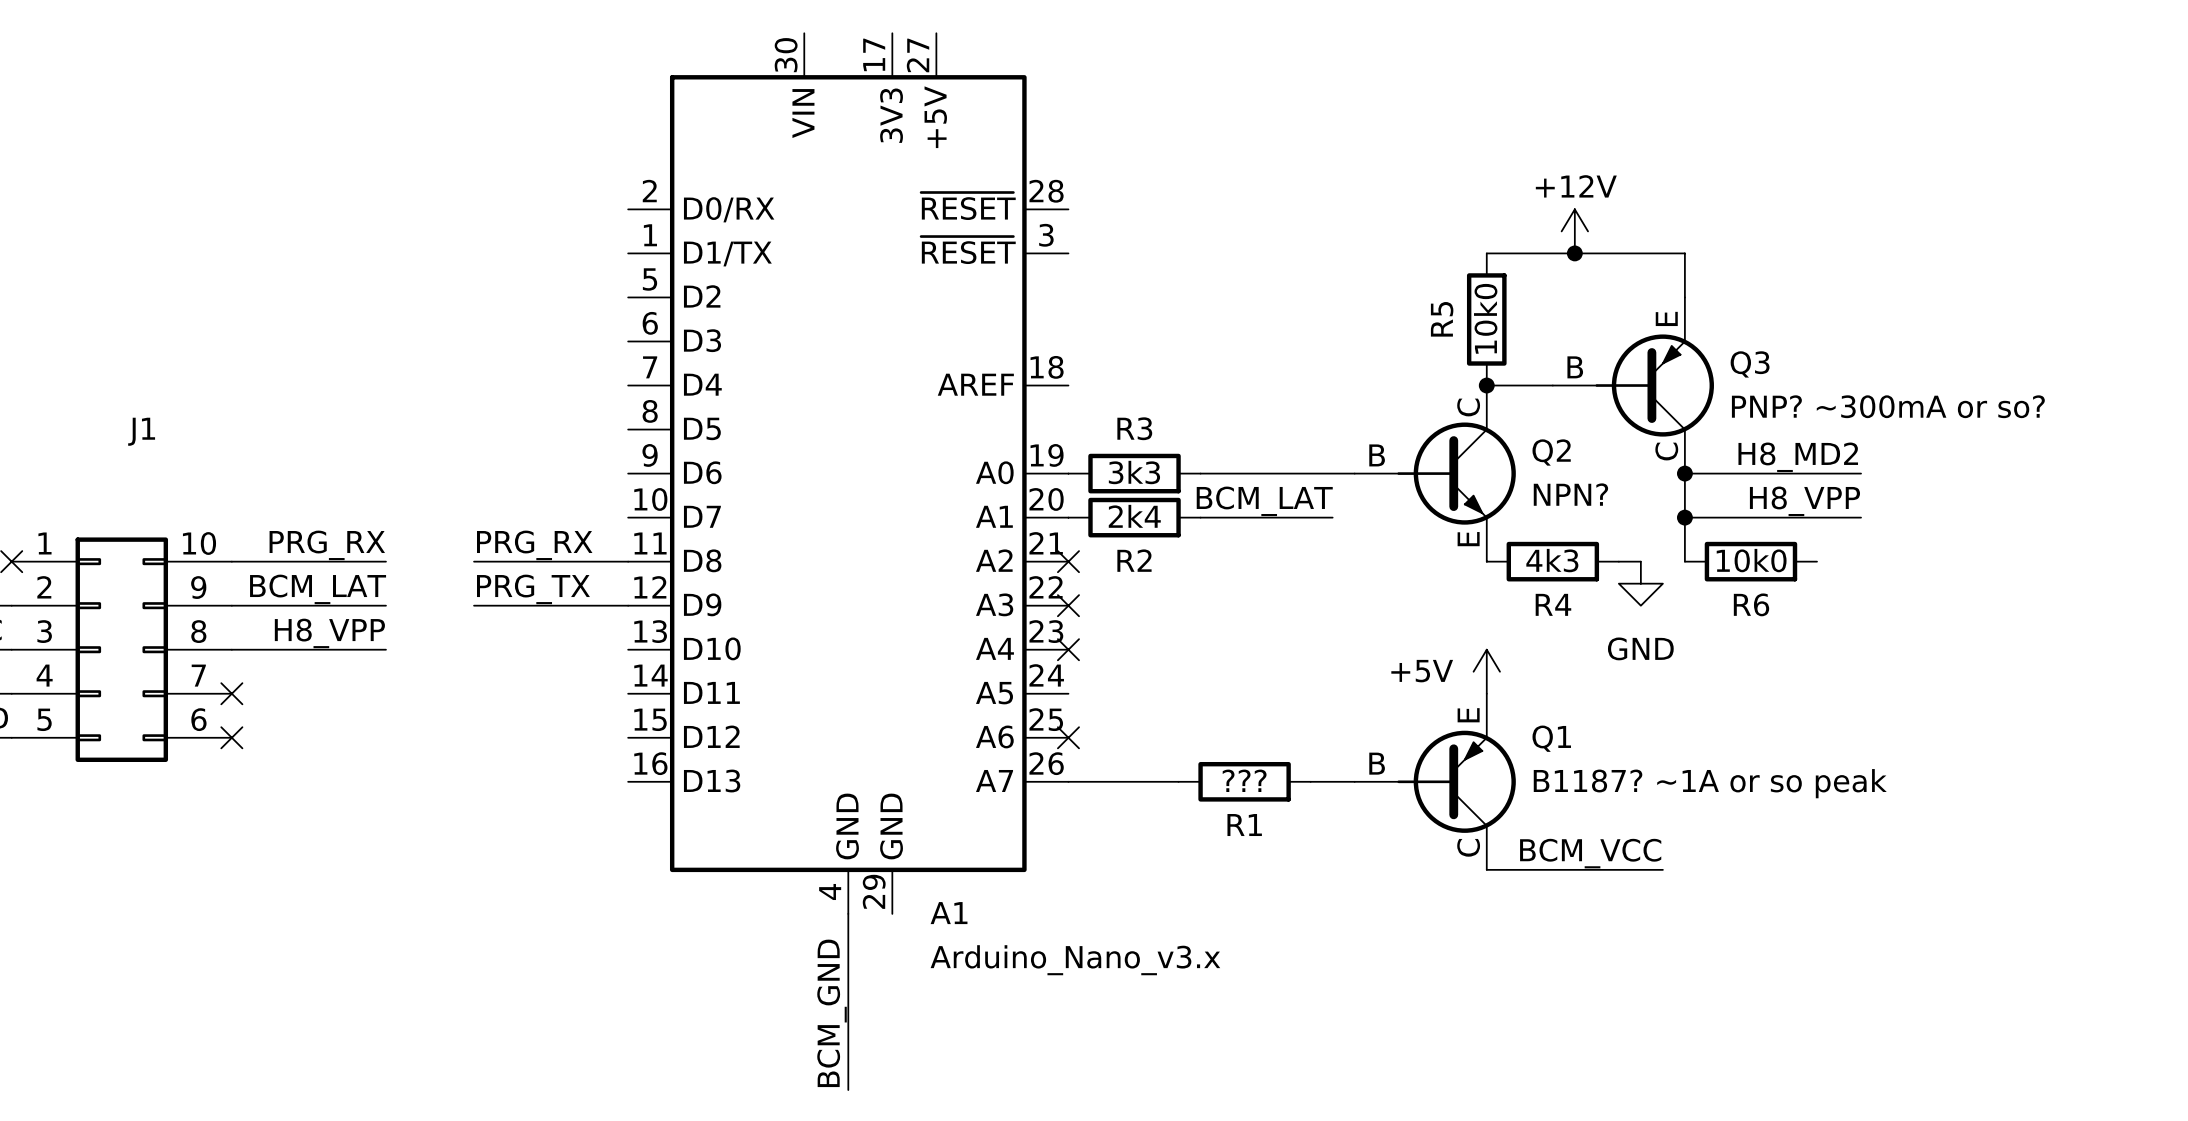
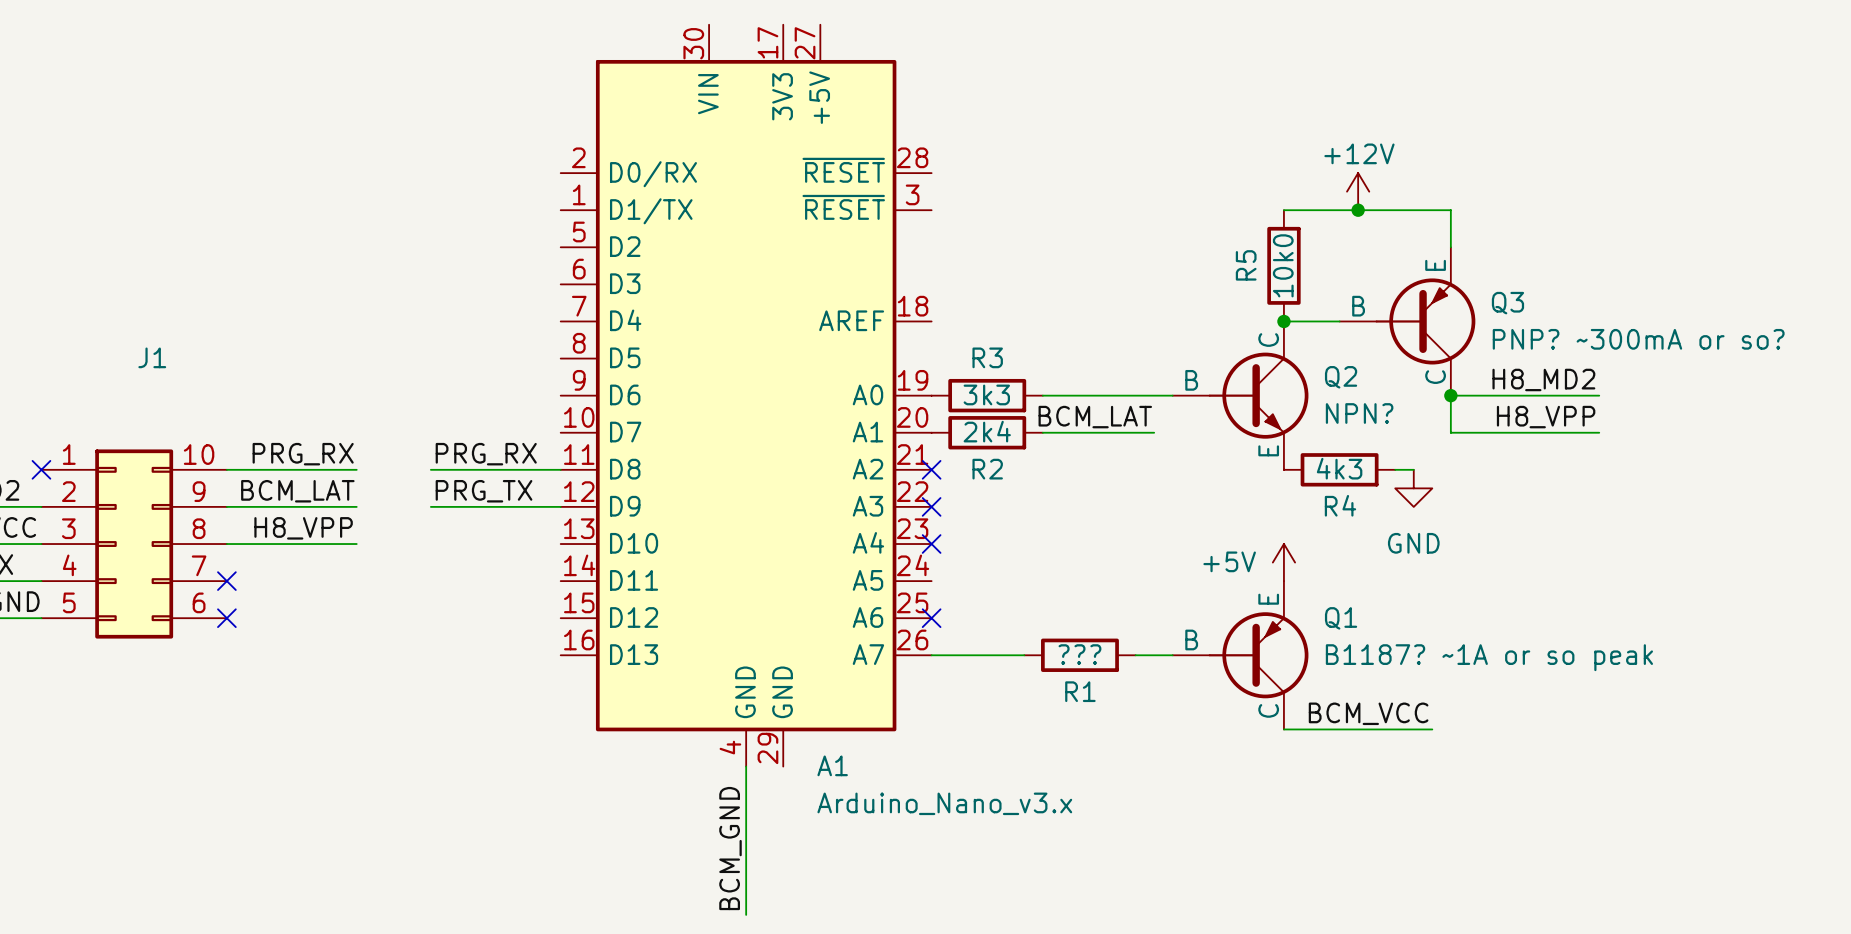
wire: (1684, 517) (1684, 561) -> none
junction: (1684, 517) -> none
R6: 10k0 (1750, 561) -> none

